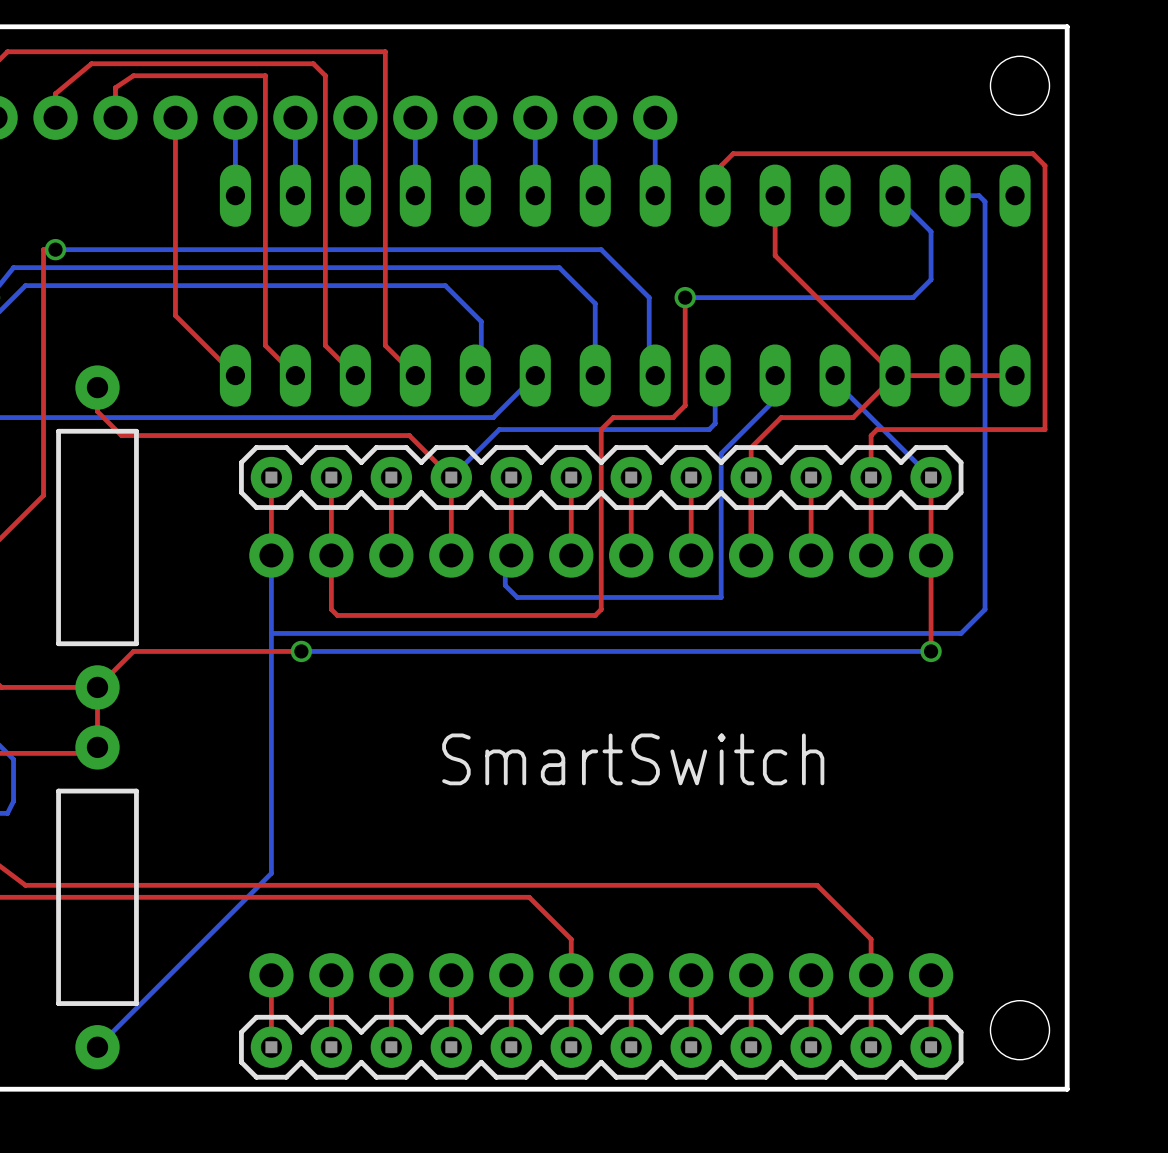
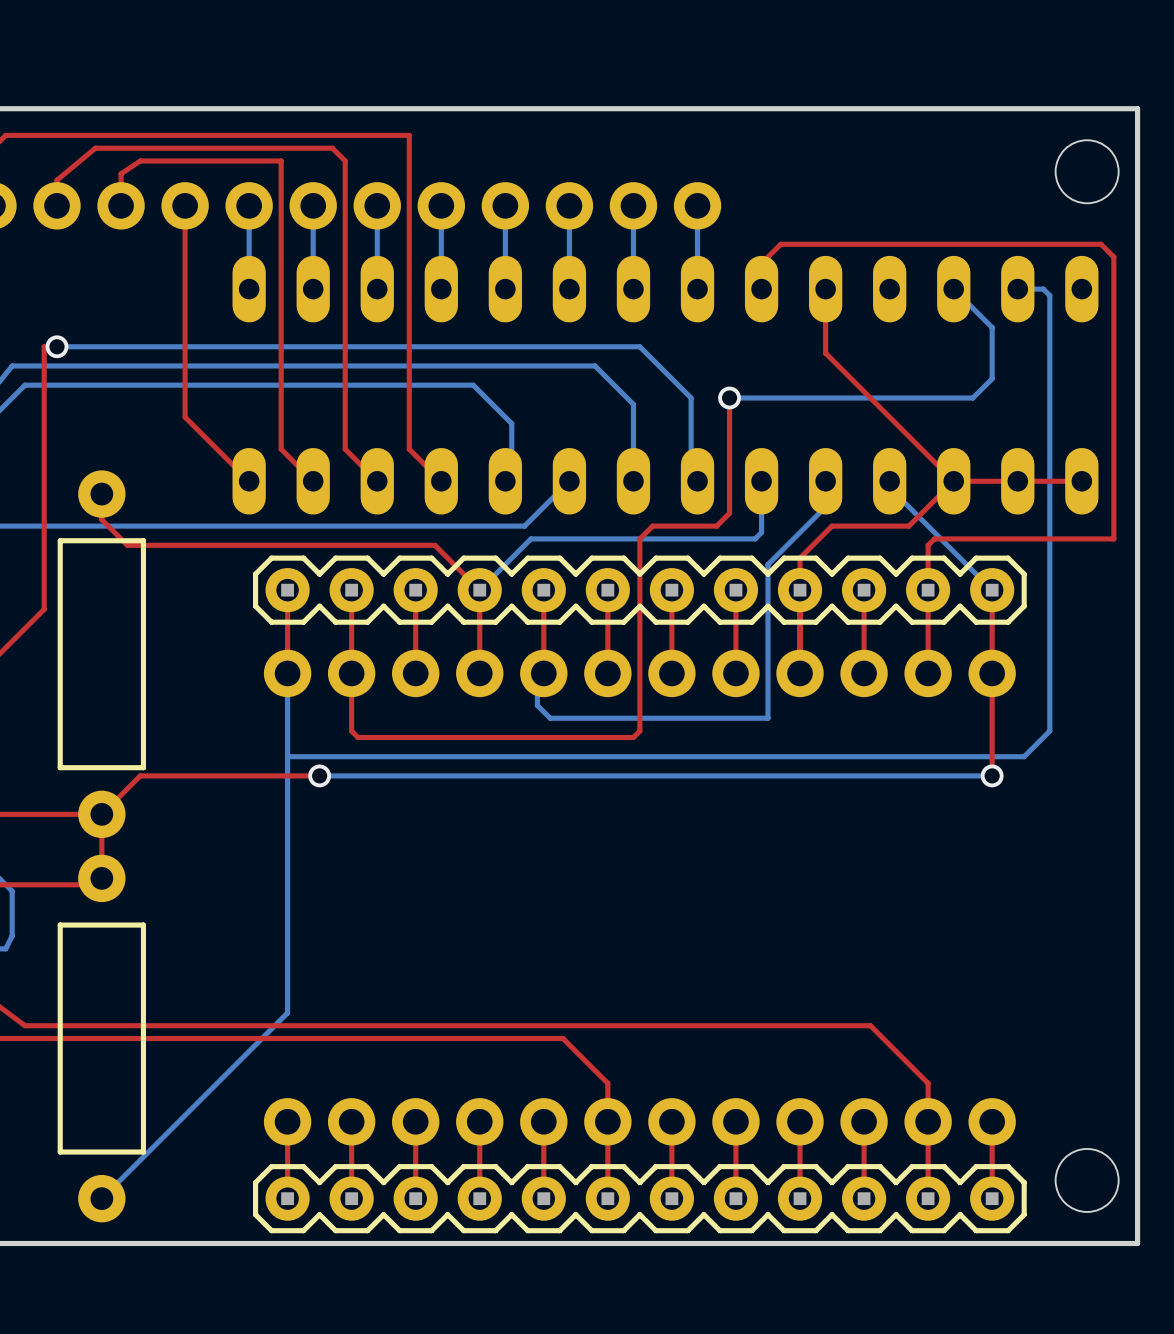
text: SmartSwitch (633, 759) -> none

